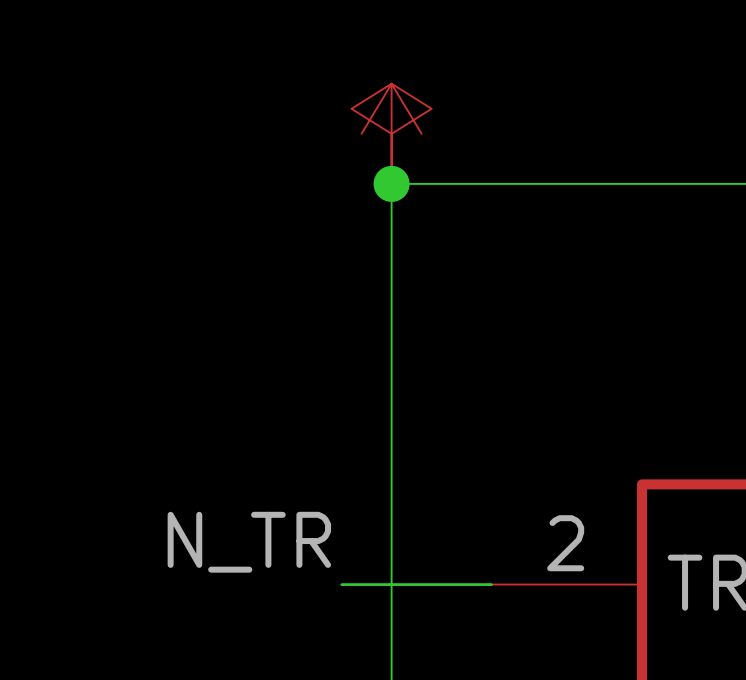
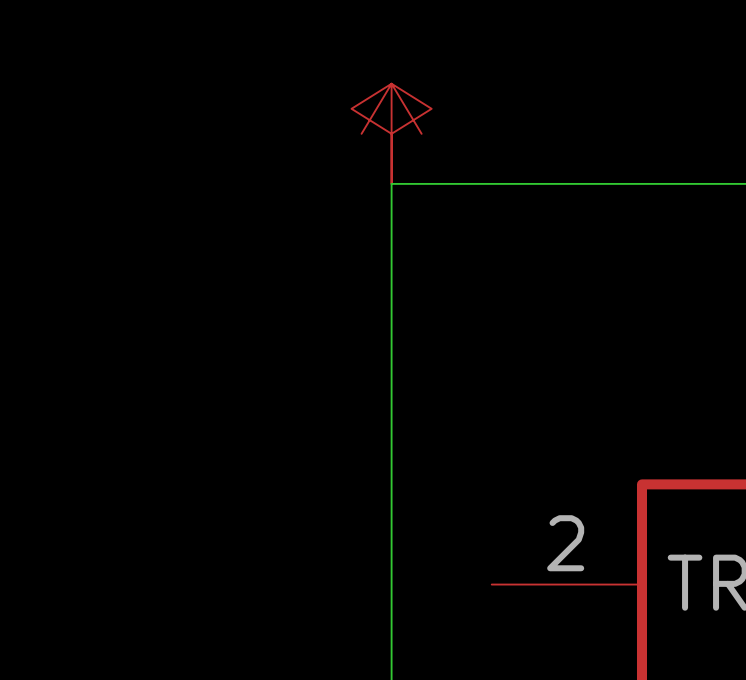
junction: (391, 183) -> none
label: N_TR (249, 542) -> none
wire: (341, 584) (491, 584) -> none

